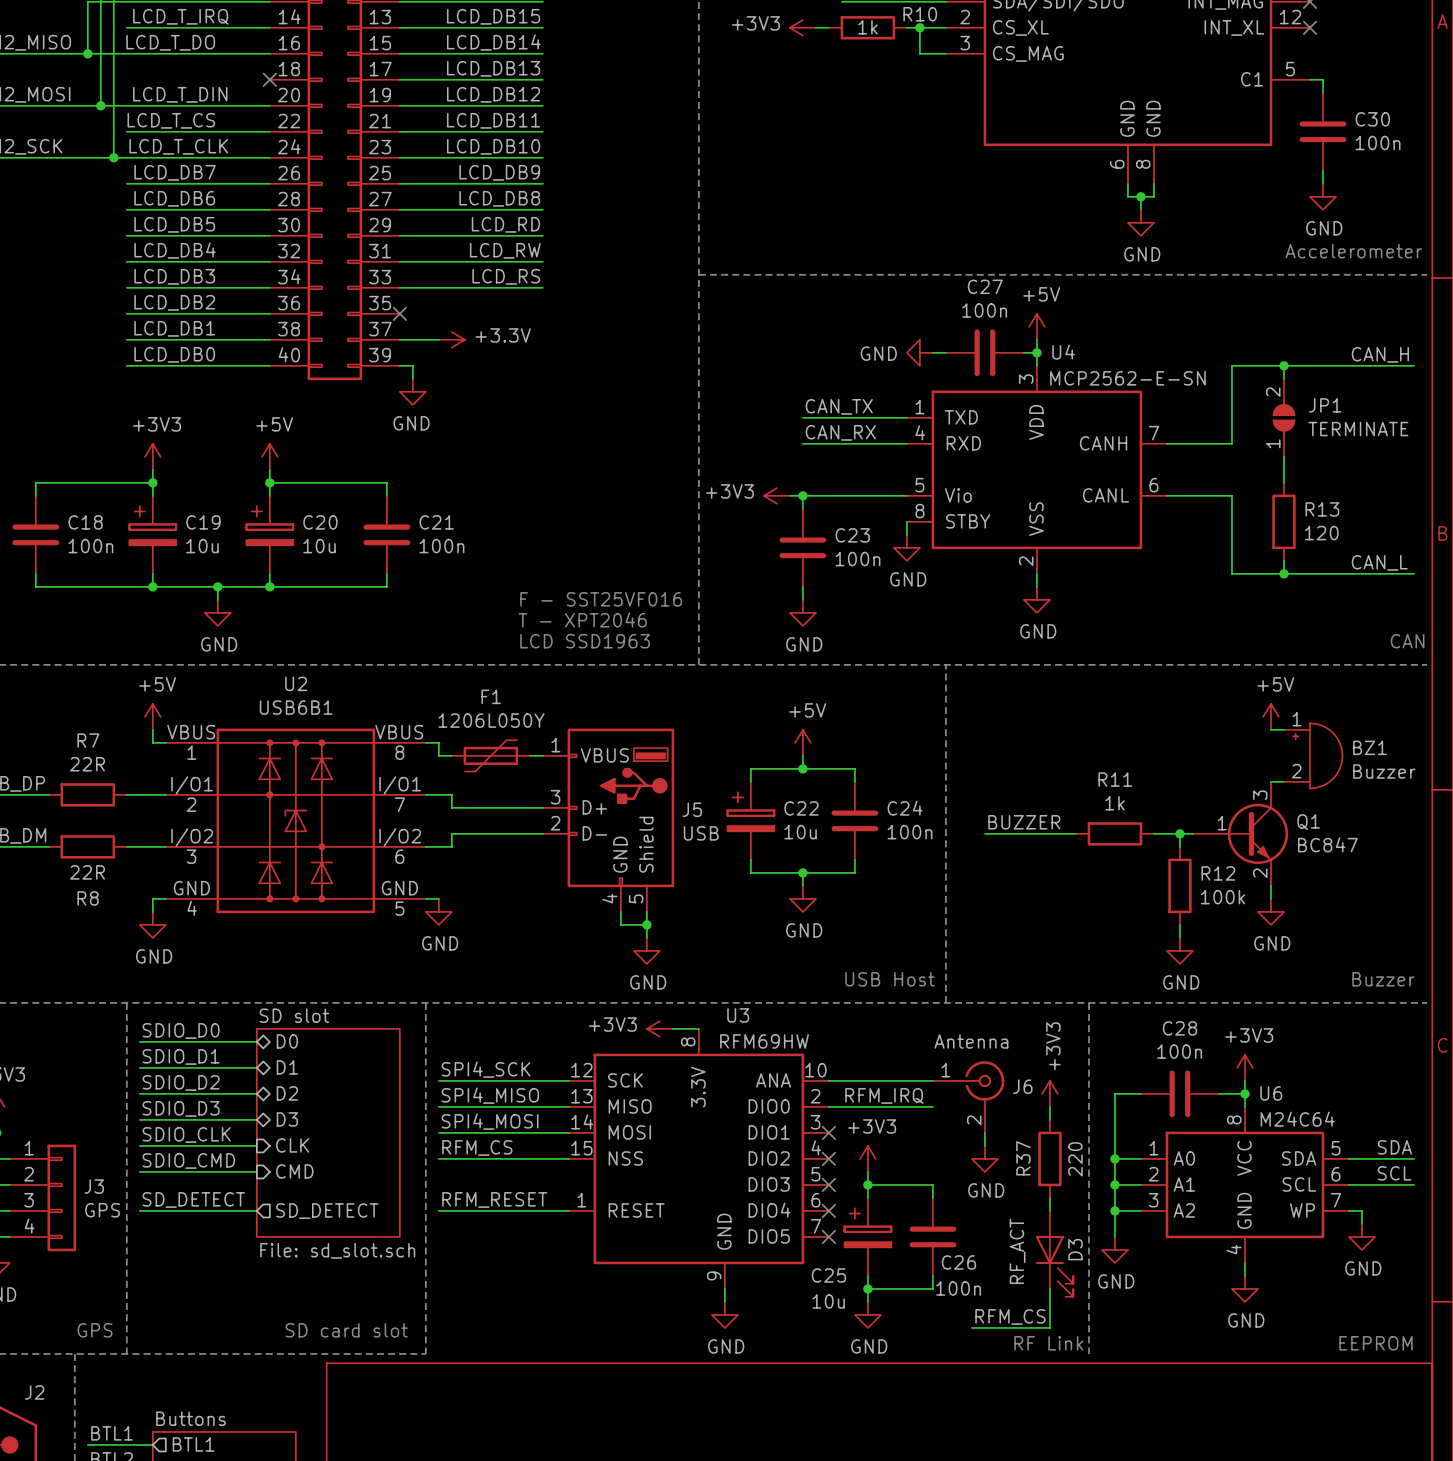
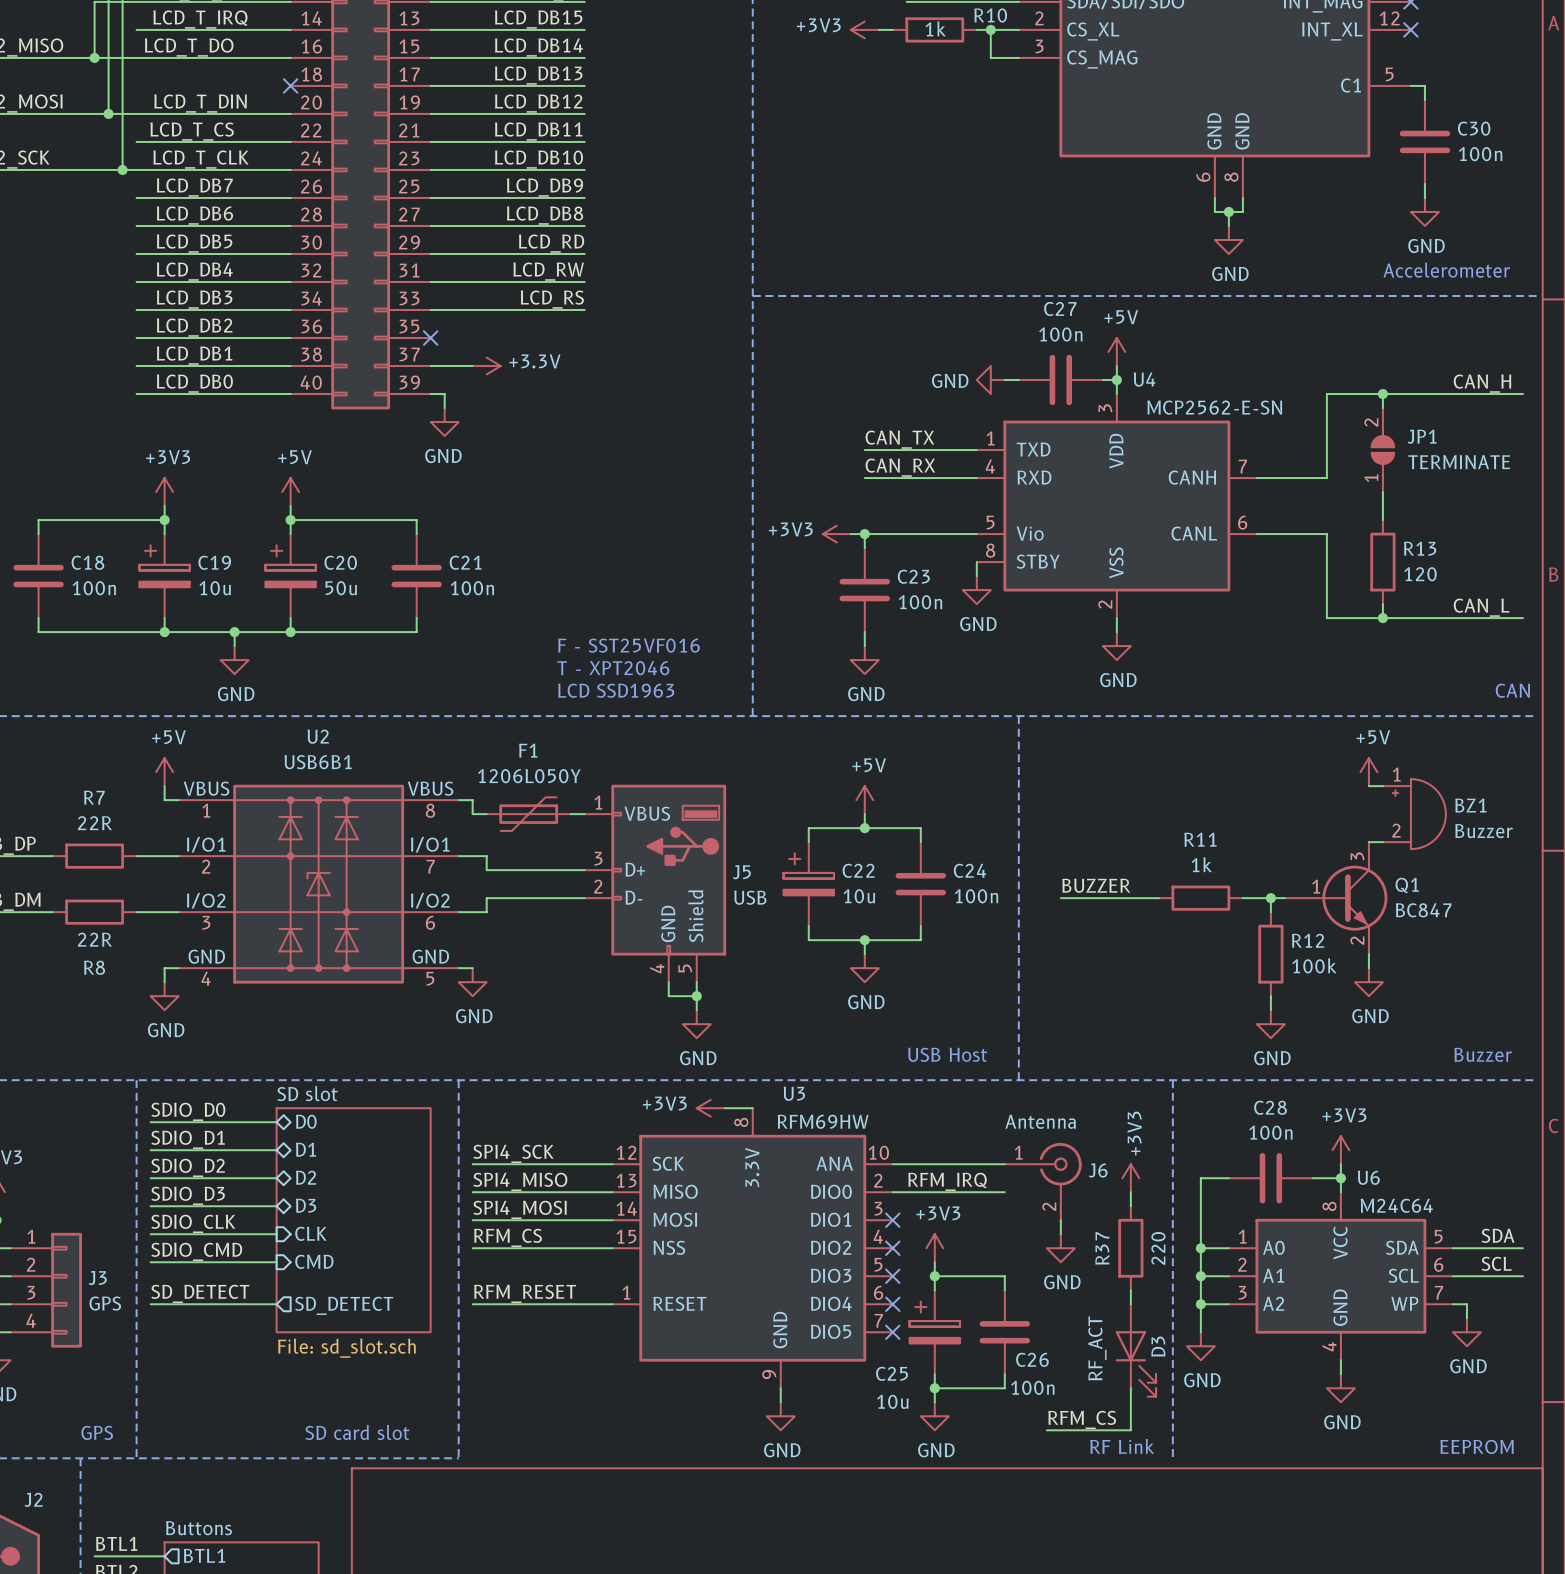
C20 value: 10u (319, 546) -> 50u (341, 588)

